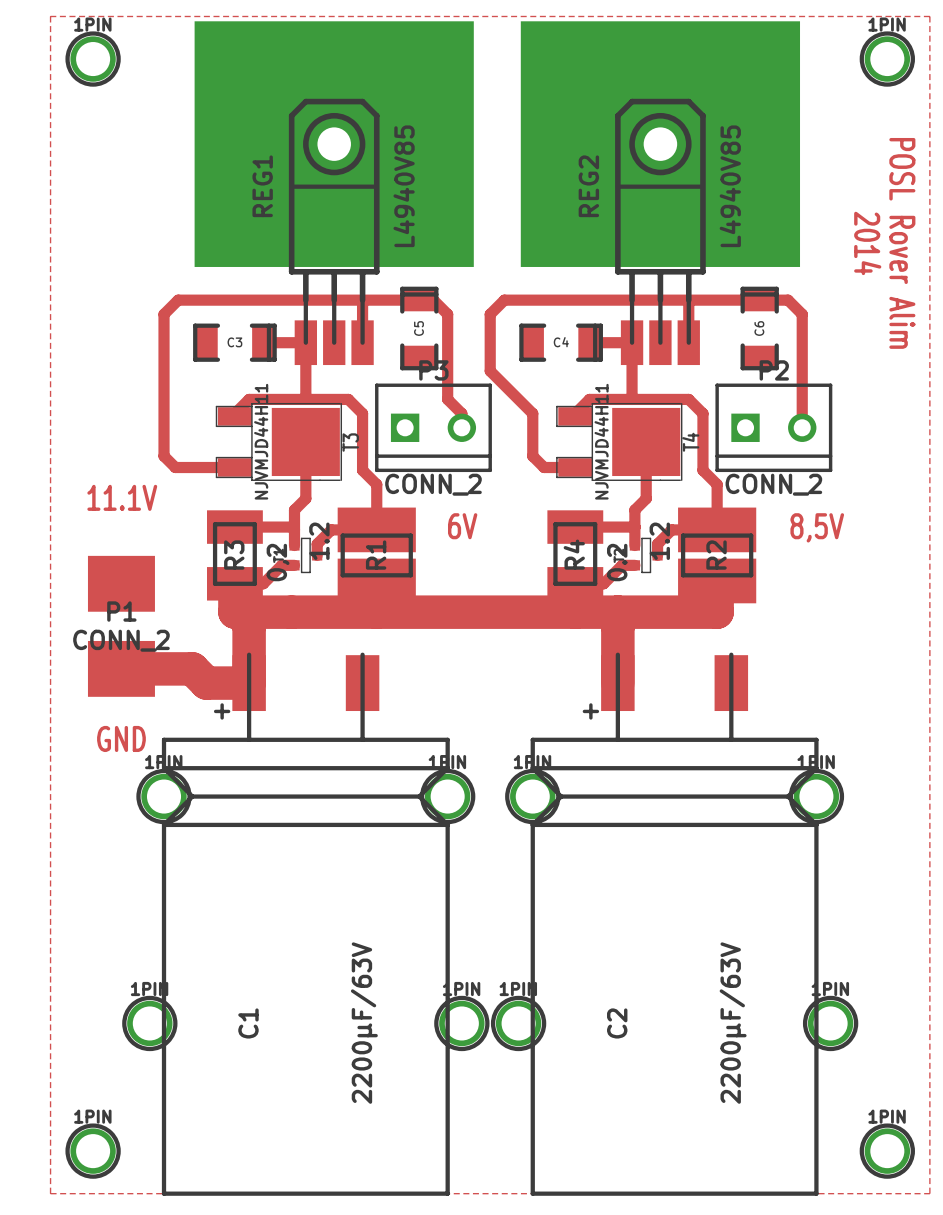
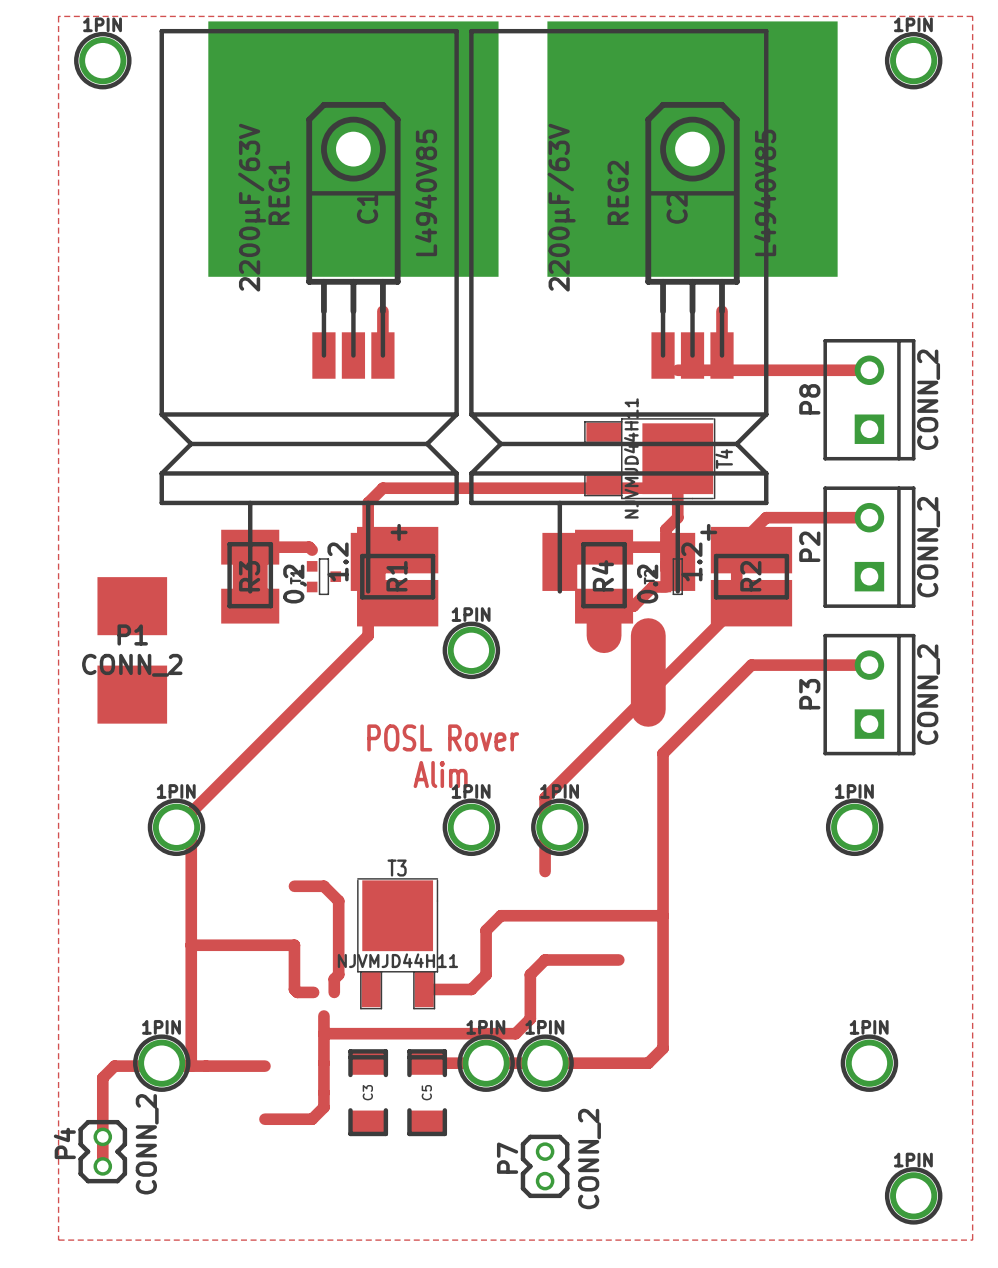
1PIN position: (887, 59) -> (913, 60)
text: 2014 (867, 243) -> none
text: POSL Rover Alim (902, 243) -> none
C5 position: (419, 328) -> (427, 1092)
C6: (759, 328) -> none
C3 rotation: 0° (234, 342) -> 90° counterclockwise (368, 1092)
C3 position: (234, 342) -> (368, 1092)
track: (263, 342) (305, 342) (305, 399) -> none
C4: (561, 342) -> none
track: (589, 342) (632, 342) (632, 399) -> none
track: none -> (677, 370) (869, 370)
P8: none -> CONN_2 (869, 399)
track: (234, 416) (234, 413) (249, 399) (348, 399) (362, 413) (362, 470) (376, 484) (376, 529) (331, 529) (317, 544) (317, 555) -> none
track: (575, 416) (575, 413) (589, 399) (688, 399) (702, 413) (702, 470) (717, 484) (717, 529) (671, 529) (657, 544) (657, 555) -> none
P3 rotation: 0° (433, 427) -> 90° counterclockwise (869, 694)
P3 position: (433, 427) -> (869, 694)
track: (461, 427) (461, 413) (447, 399) (447, 314) (433, 300) (178, 300) (164, 314) (164, 456) (175, 467) (234, 467) -> none
P2 rotation: 0° (773, 427) -> 90° counterclockwise (869, 547)
P2 position: (773, 427) -> (869, 547)
track: (802, 427) (802, 314) (788, 300) (504, 300) (490, 314) (490, 371) (532, 413) (532, 456) (544, 467) (575, 467) -> none
T3 rotation: 0° (278, 441) -> 90° counterclockwise (397, 943)
T3 position: (278, 441) -> (397, 943)
track: (305, 441) (305, 498) (294, 510) (294, 545) -> none
track: none -> (677, 488) (382, 488) (368, 502) (368, 635) (191, 812) (191, 1066)
text: 11.1V (122, 497) -> none
track: none -> (869, 517) (766, 517) (736, 547) (736, 606) (545, 797) (545, 871)
text: 6V (462, 526) -> none
text: 8,5V (817, 527) -> none
track: (294, 565) (281, 565) (263, 583) (234, 583) (234, 612) (717, 612) (717, 580) -> none
track: (249, 612) (249, 683) (206, 683) (192, 668) (121, 668) -> none
1PIN: none -> (471, 650)
track: none -> (869, 665) (751, 665) (663, 753) (663, 1048) (648, 1063) (427, 1063)
text: none -> POSL Rover (443, 737)
text: GND (121, 738) -> none
text: none -> Alim (440, 774)
track: none -> (294, 886) (323, 886) (338, 901) (338, 974) (334, 979) (334, 992)
track: none -> (663, 915) (500, 915) (486, 930) (486, 974) (471, 989) (424, 989)
track: none -> (191, 945) (294, 945) (294, 989) (297, 992) (313, 992)
C1 rotation: 0° (305, 924) -> 180° (309, 311)
C1 position: (305, 924) -> (309, 311)
track: none -> (618, 959) (545, 959) (530, 974) (530, 1018) (515, 1033) (323, 1033)
C2 rotation: 0° (674, 924) -> 180° (618, 311)
C2 position: (674, 924) -> (618, 311)
track: none -> (323, 1016) (323, 1107) (312, 1119) (264, 1119)
track: none -> (264, 1066) (114, 1066) (102, 1077) (102, 1166)
P4: none -> CONN_2 (102, 1151)
P7: none -> CONN_2 (545, 1166)
1PIN: (93, 1151) -> none
1PIN position: (887, 1151) -> (913, 1195)

